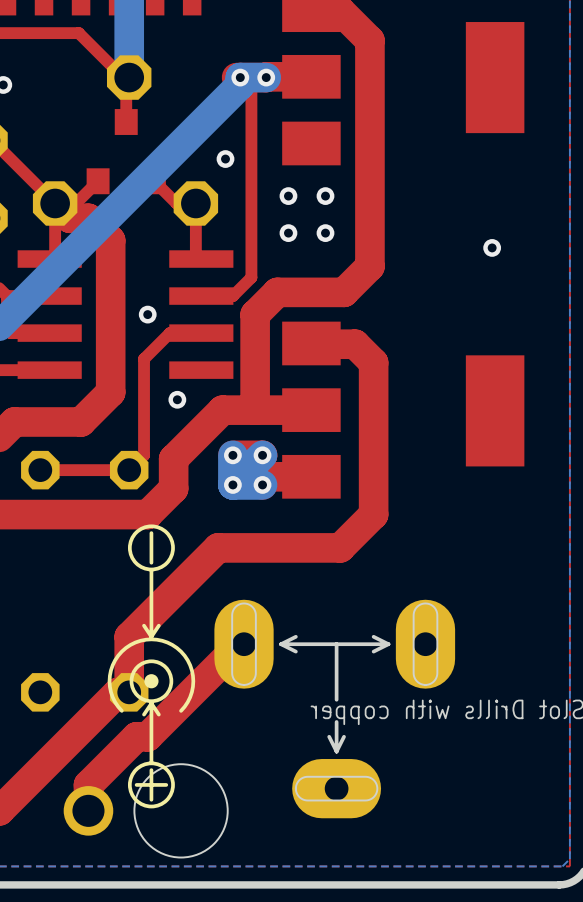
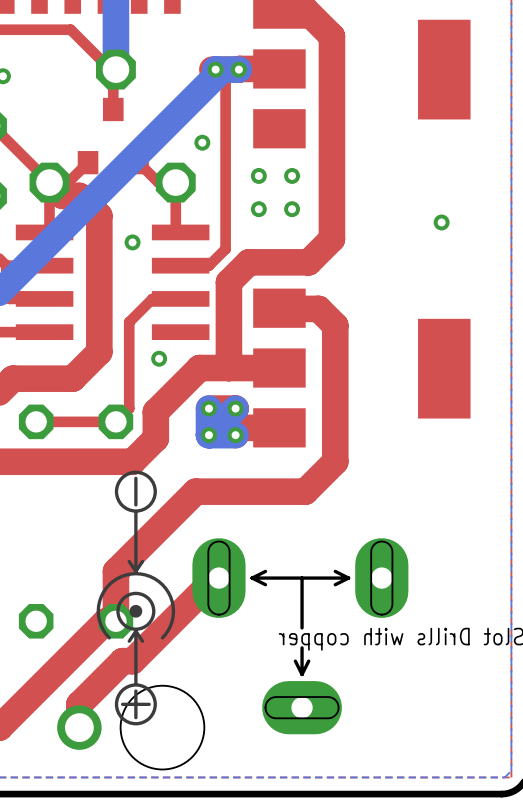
via position: (147, 314) -> (132, 242)

